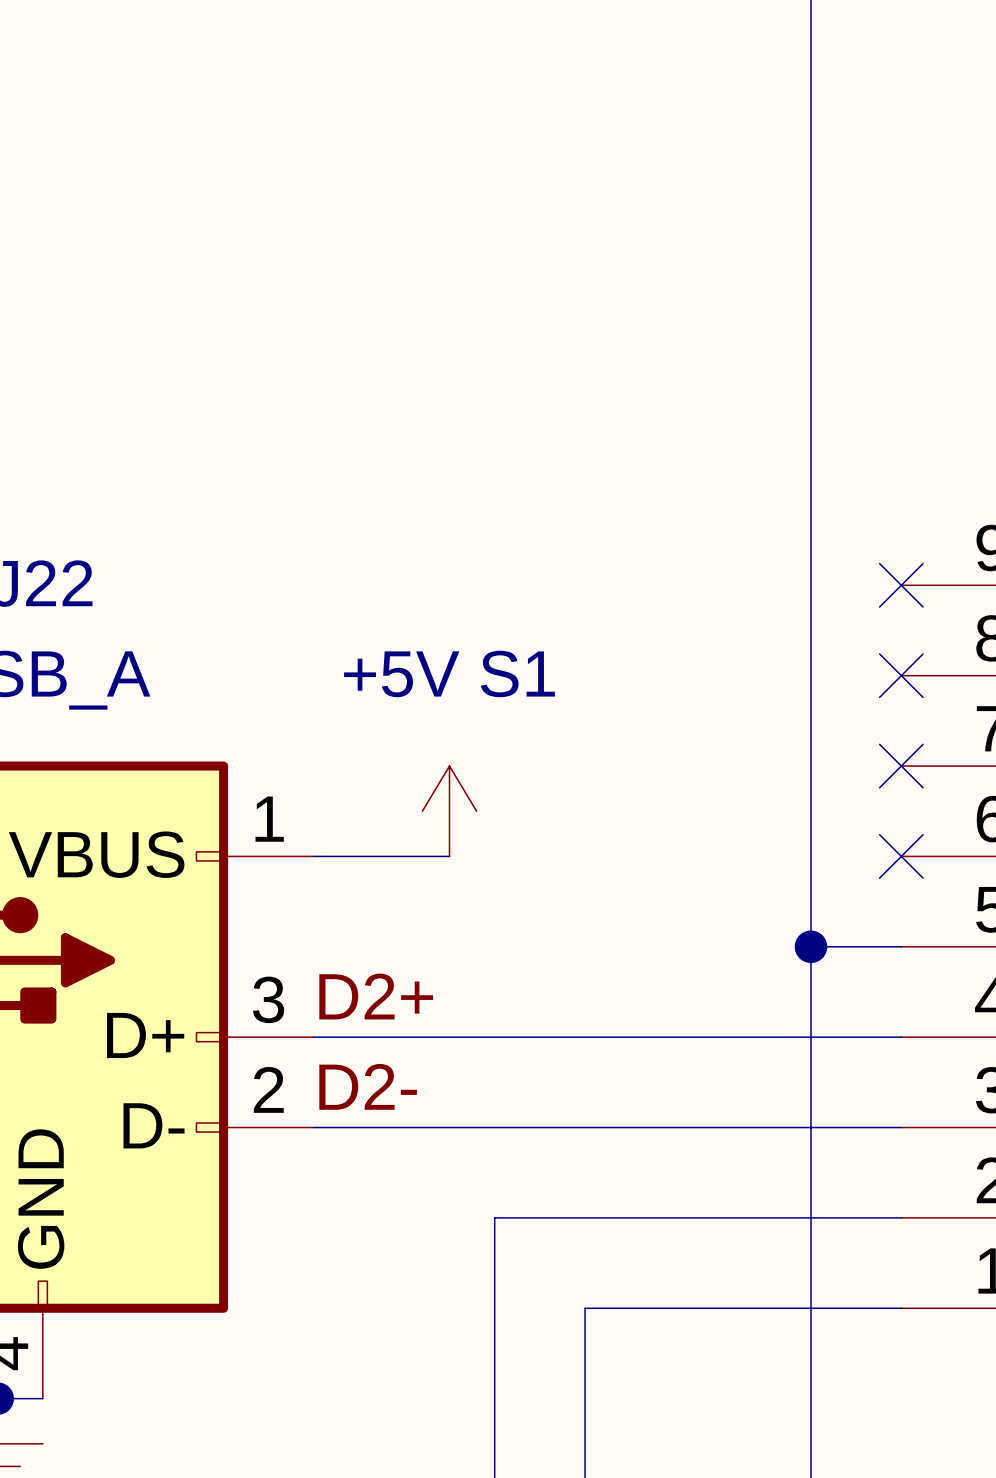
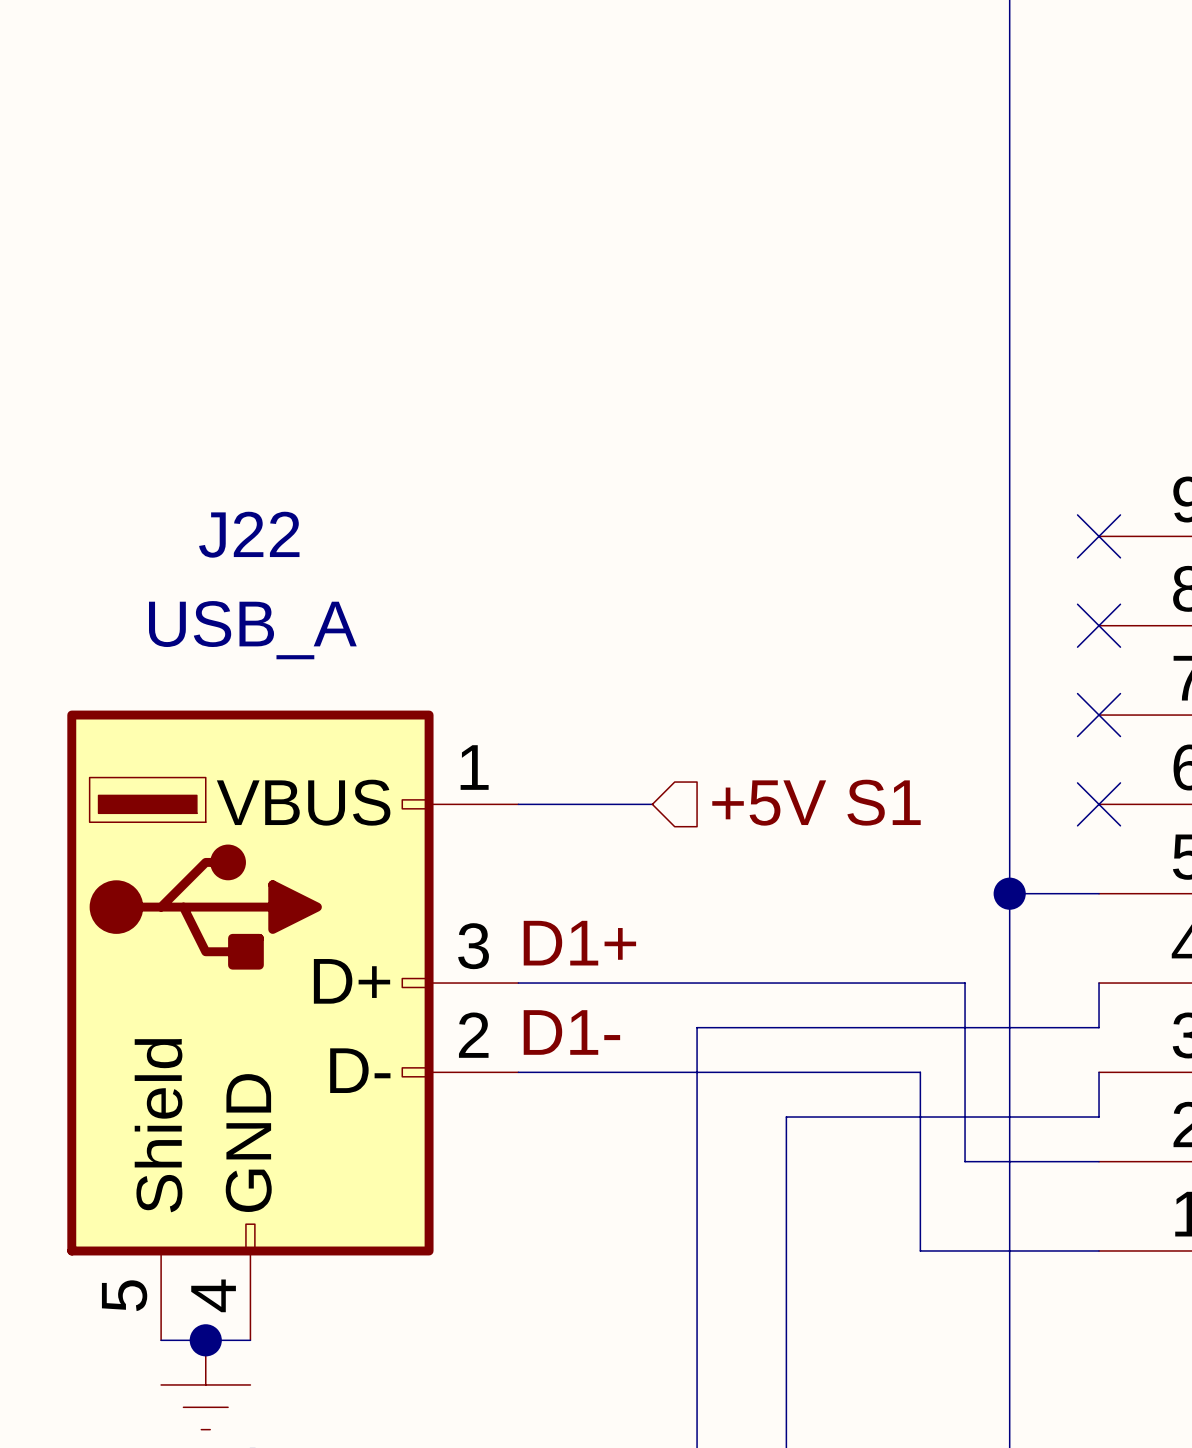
power symbol: +5V S1 (449, 811) -> none
hierarchical label: none -> +5V S1 (816, 802)
label: D2+ (376, 996) -> D1+ (579, 943)
wire: (765, 1037) (901, 1037) -> (965, 983) (965, 1161)
label: D2- (368, 1086) -> D1- (571, 1032)
wire: (720, 1127) (901, 1127) -> (786, 1250) (786, 1117) (1099, 1117) (1099, 1072)
wire: (494, 1217) (765, 1217) -> (697, 1161) (697, 1027) (1099, 1027) (1099, 983)
wire: (585, 1308) (720, 1308) -> (920, 1072) (920, 1250)

